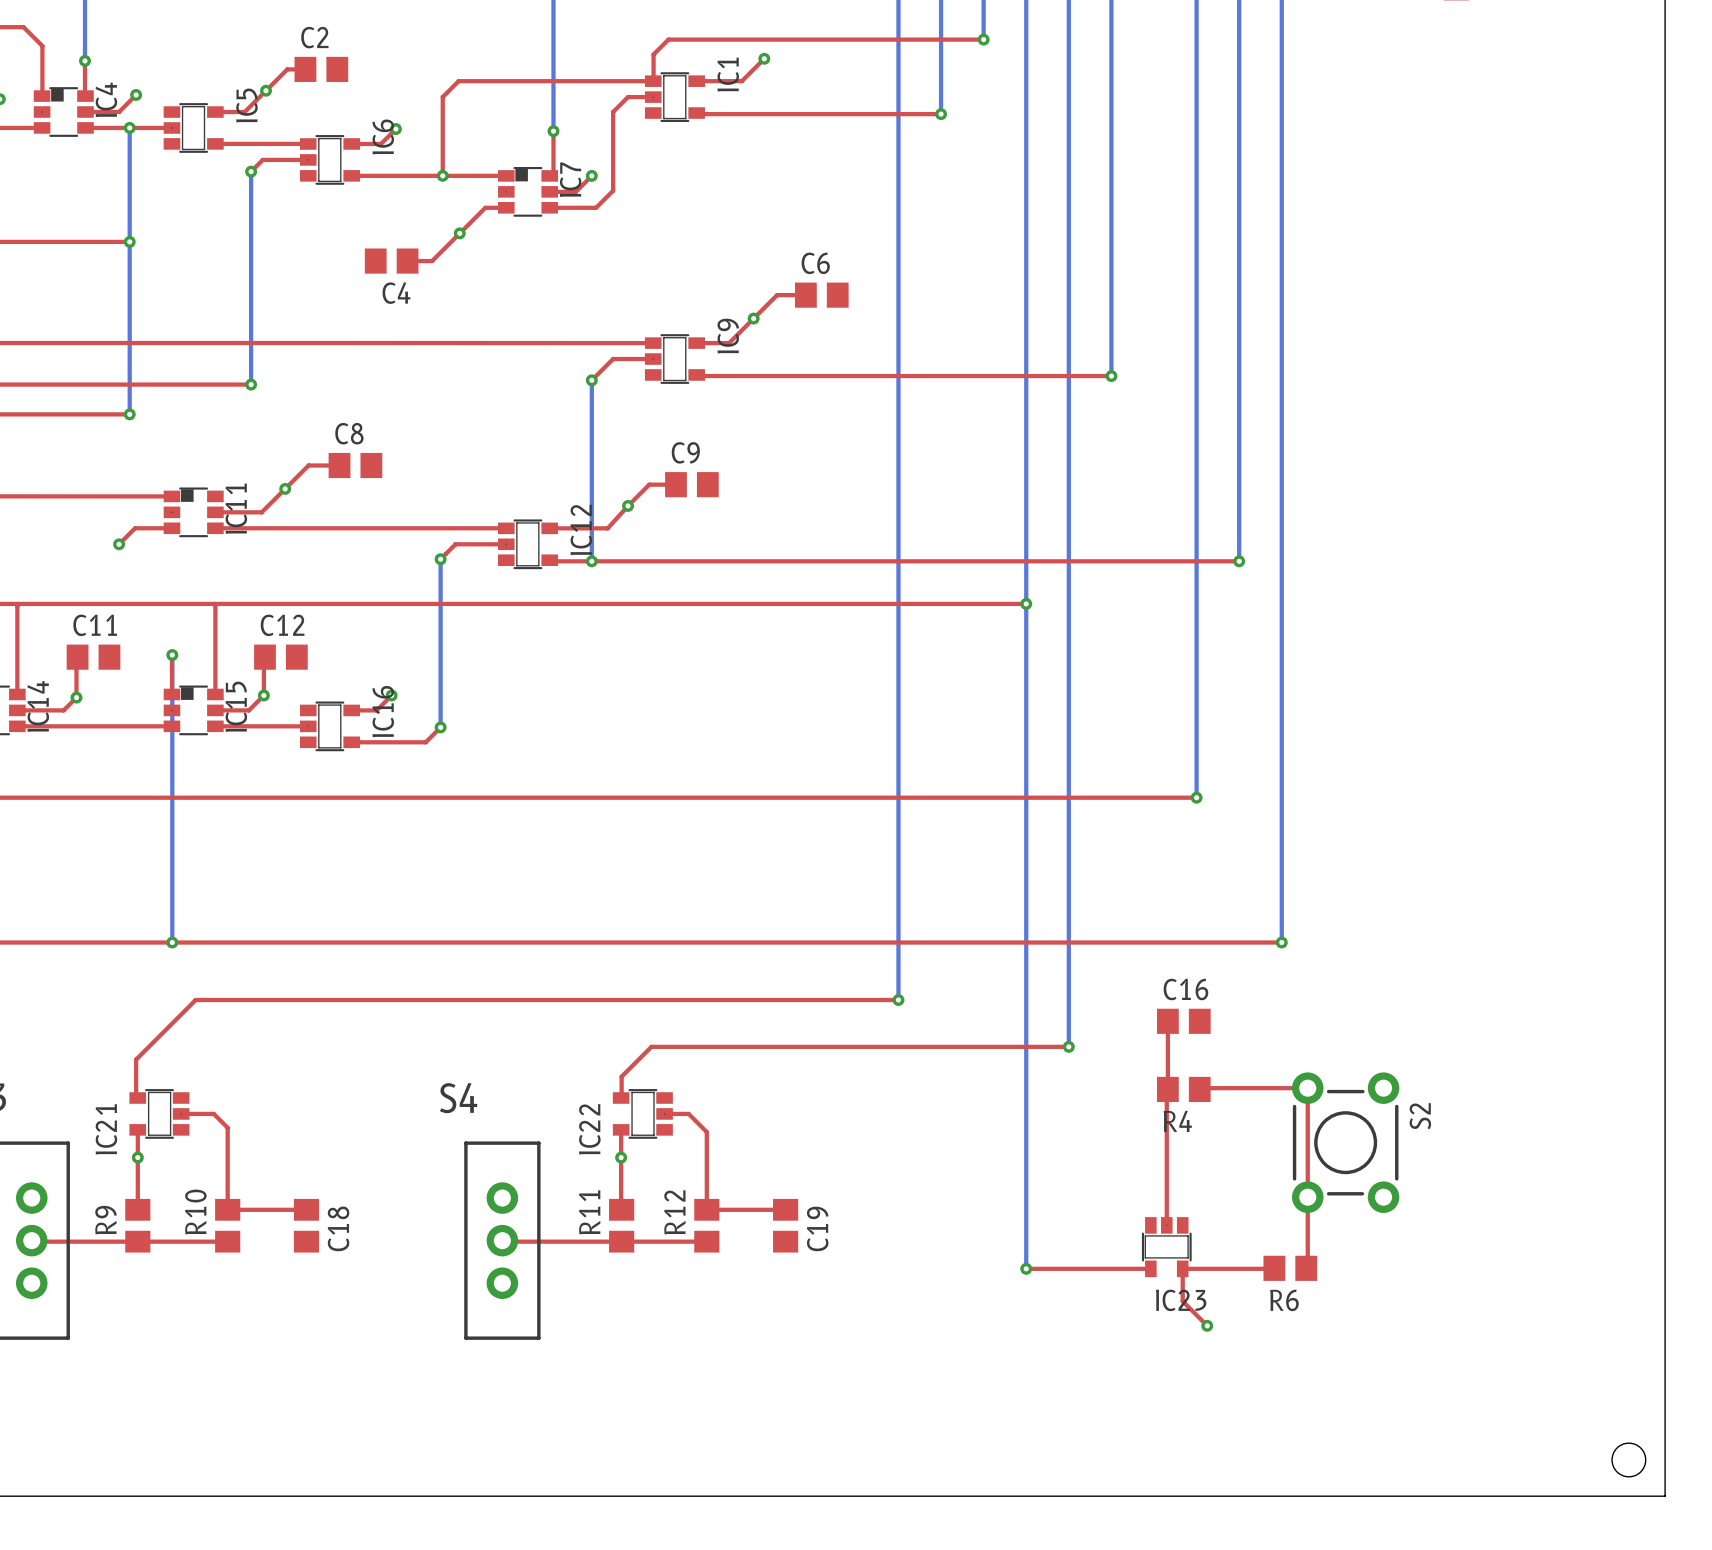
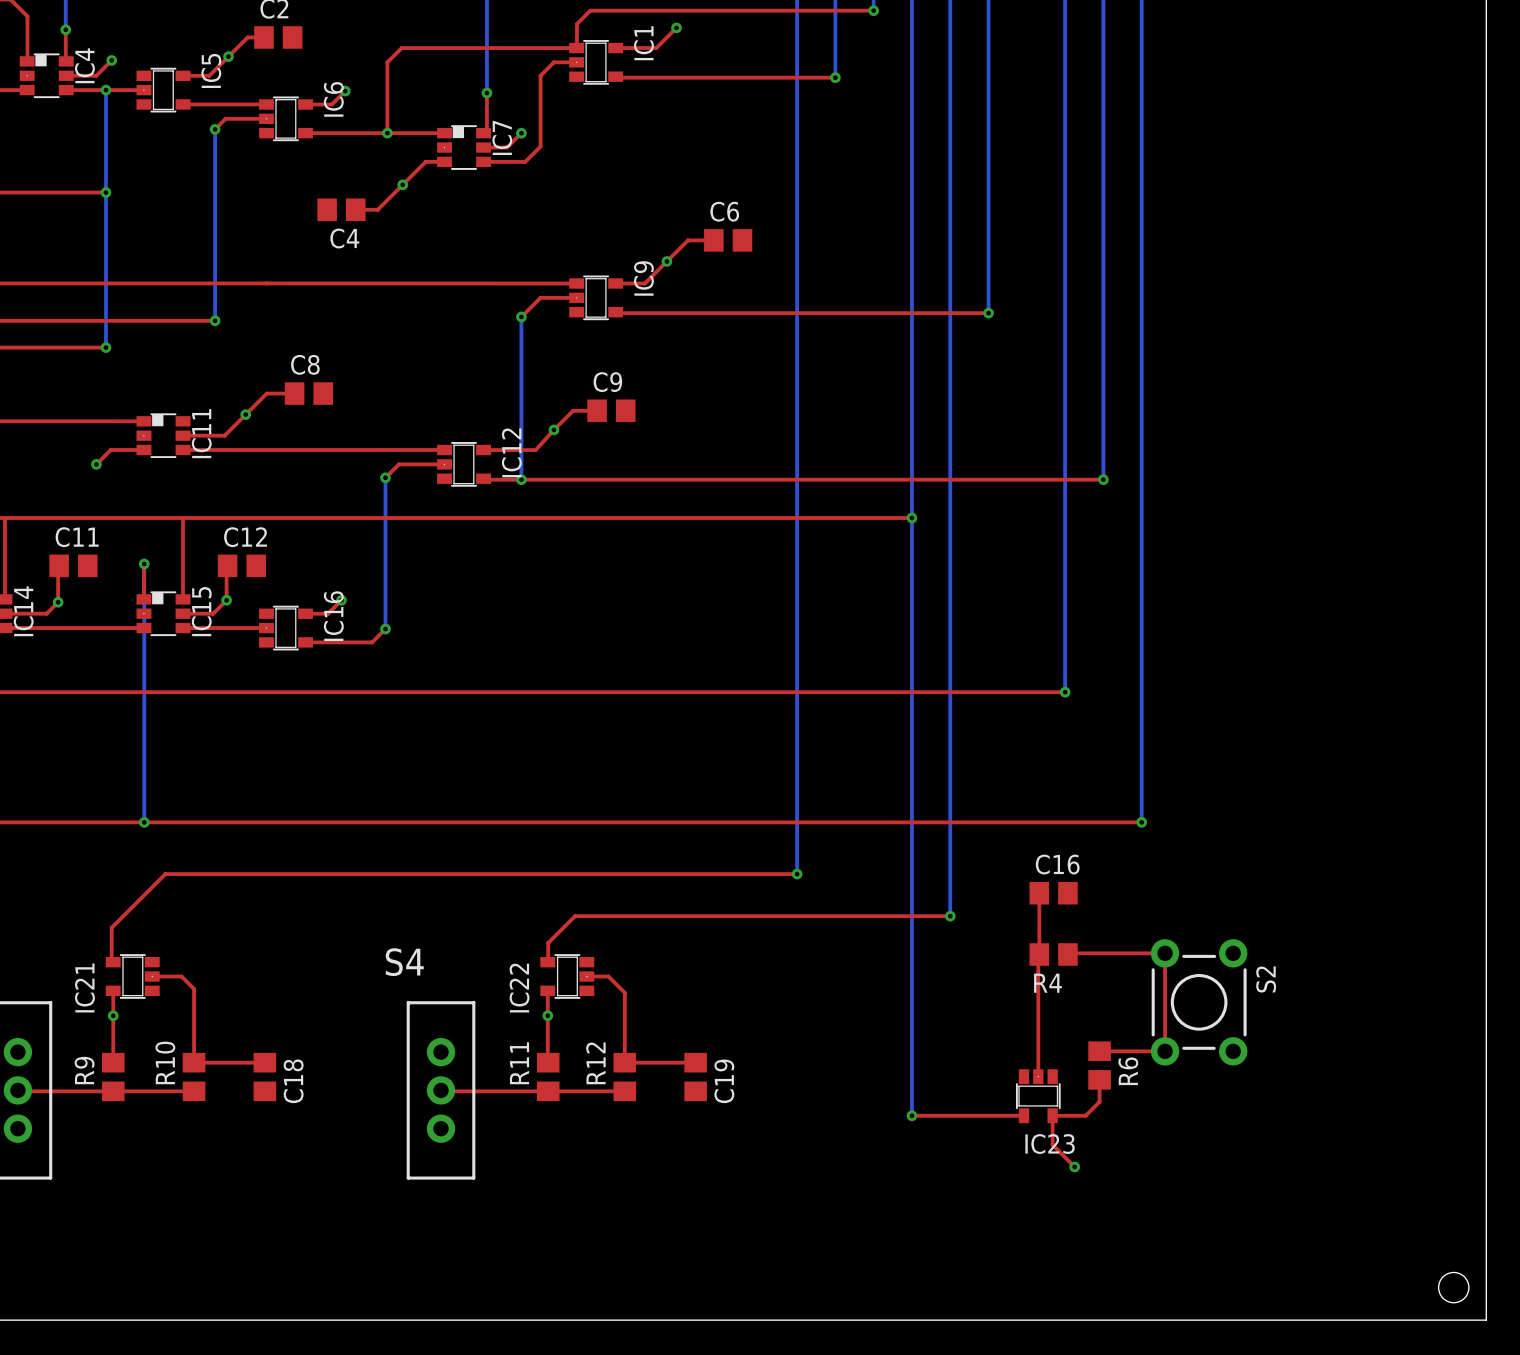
top track: (1307, 1197) (1306, 1268) -> (1165, 1051) (1099, 1051)
top track: (1274, 1268) (1219, 1268) -> (1099, 1079) (1099, 1101) (1085, 1115)
R6 rotation: 0° (1290, 1268) -> 90° clockwise (1099, 1065)
R6 position: (1290, 1268) -> (1099, 1065)
R6 name position: R6 (1284, 1300) -> R6 (1128, 1071)

